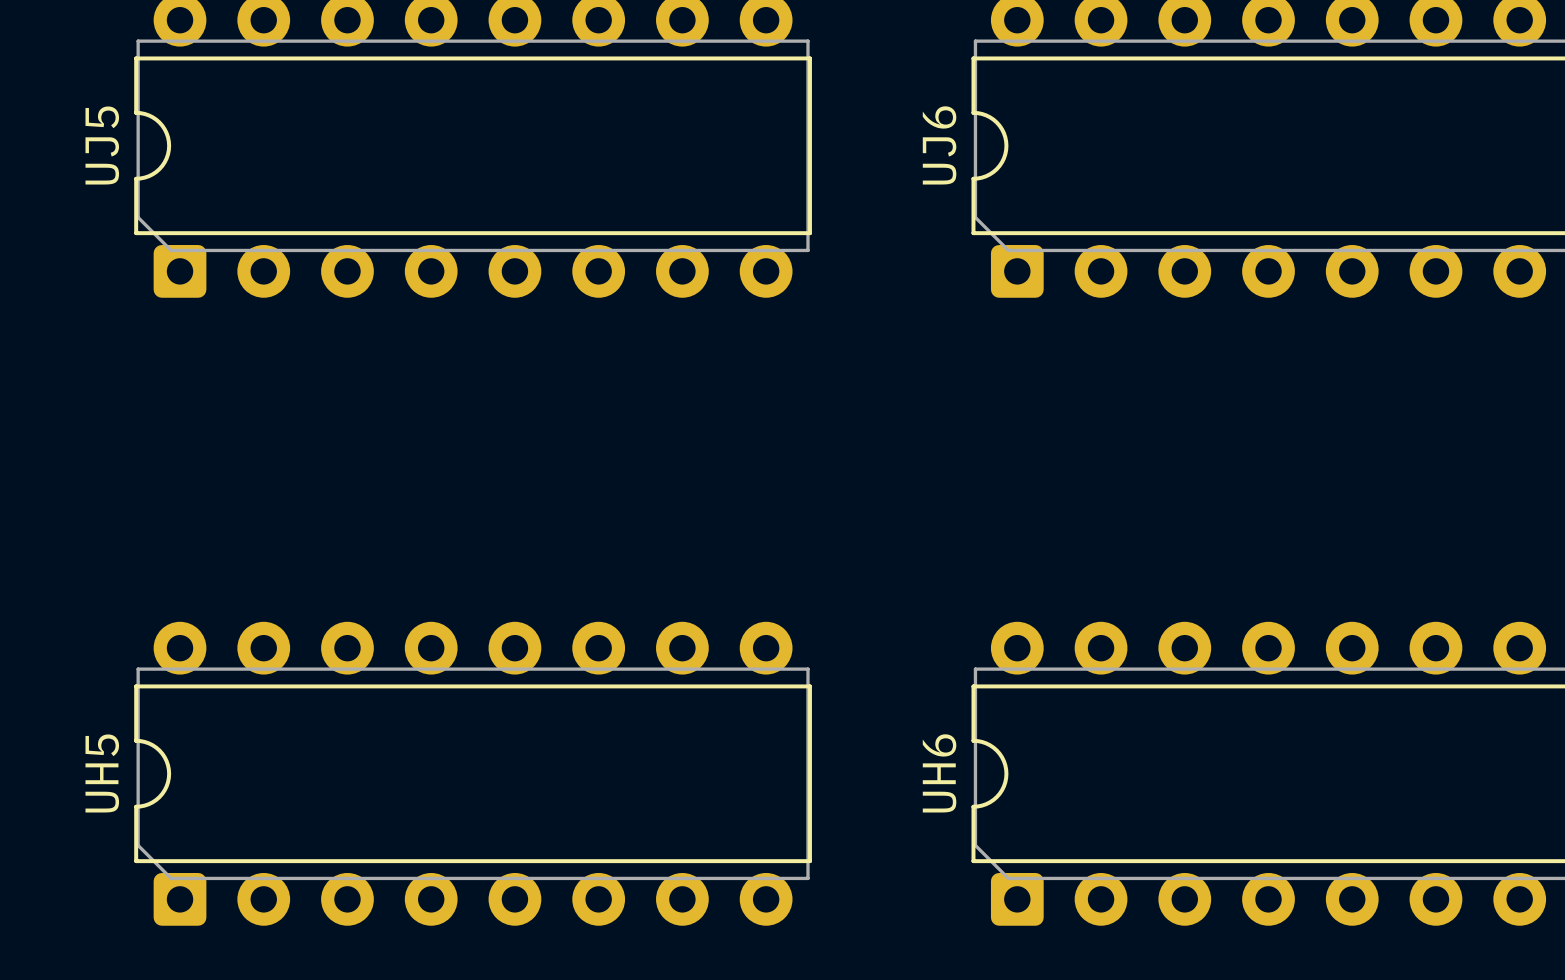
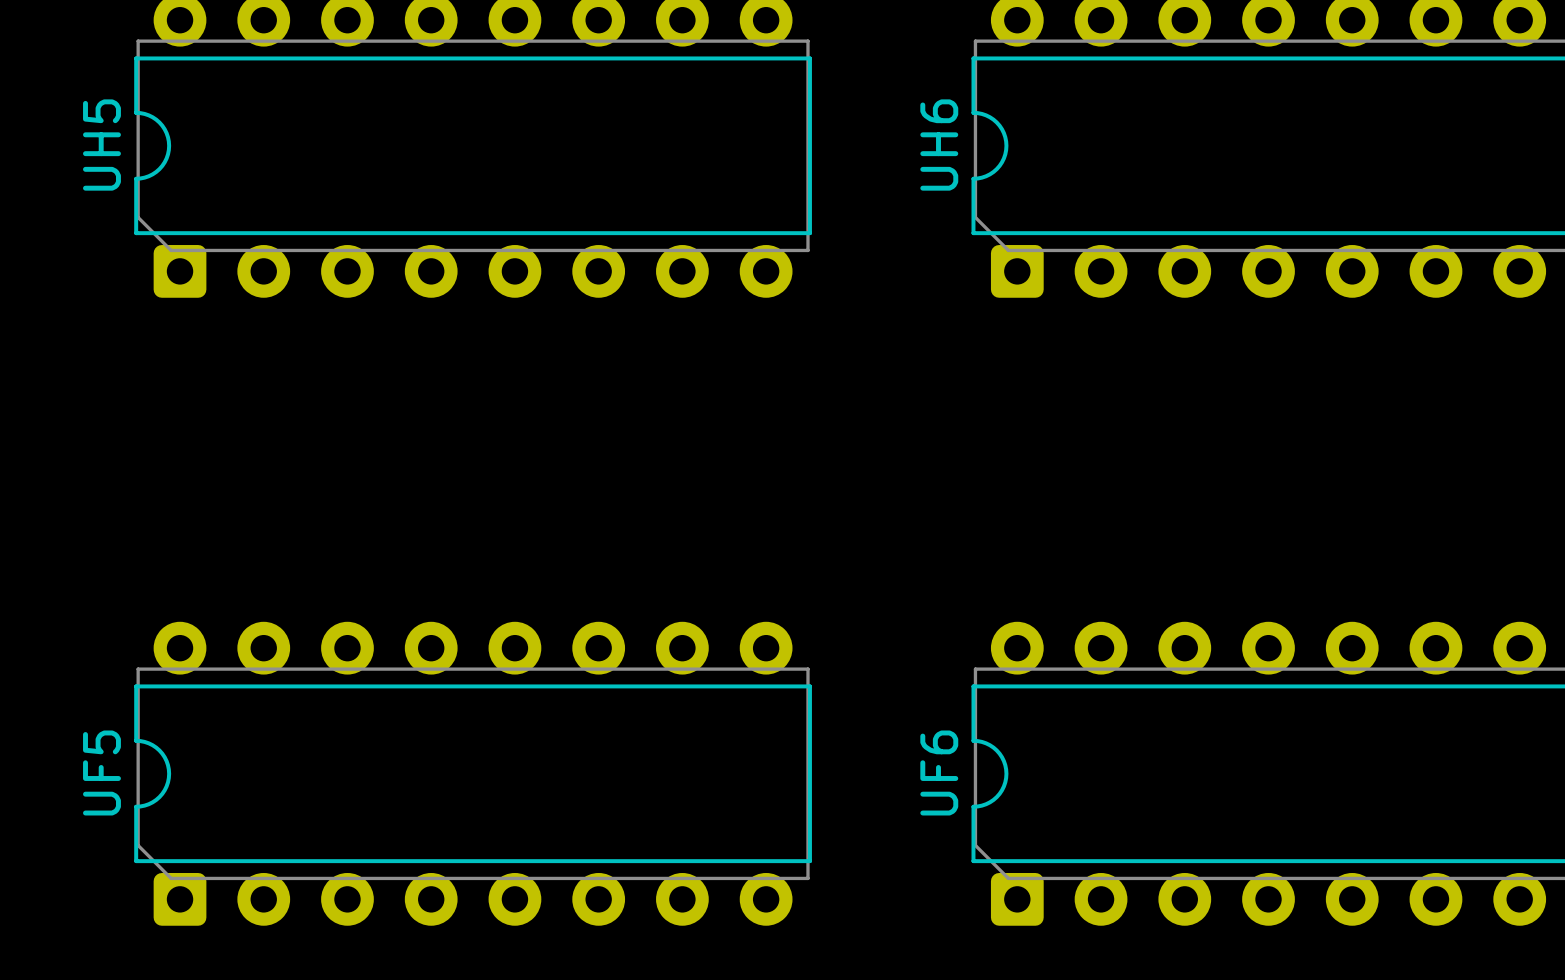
UJ5 name: UJ5 (102, 145) -> UH5 (101, 145)
UJ6 name: UJ6 (939, 145) -> UH6 (939, 145)
UH5 name: UH5 (102, 773) -> UF5 (101, 772)
UH6 name: UH6 (939, 773) -> UF6 (939, 772)

